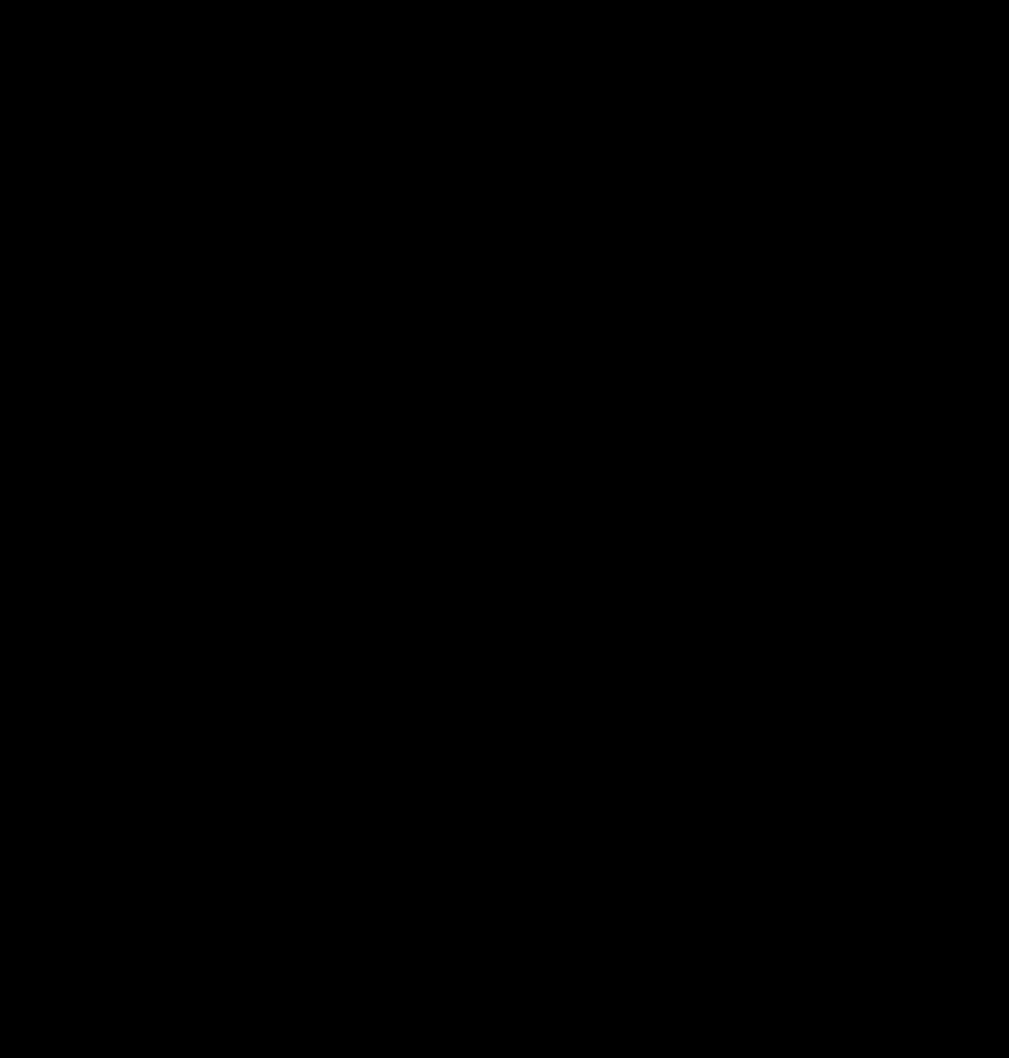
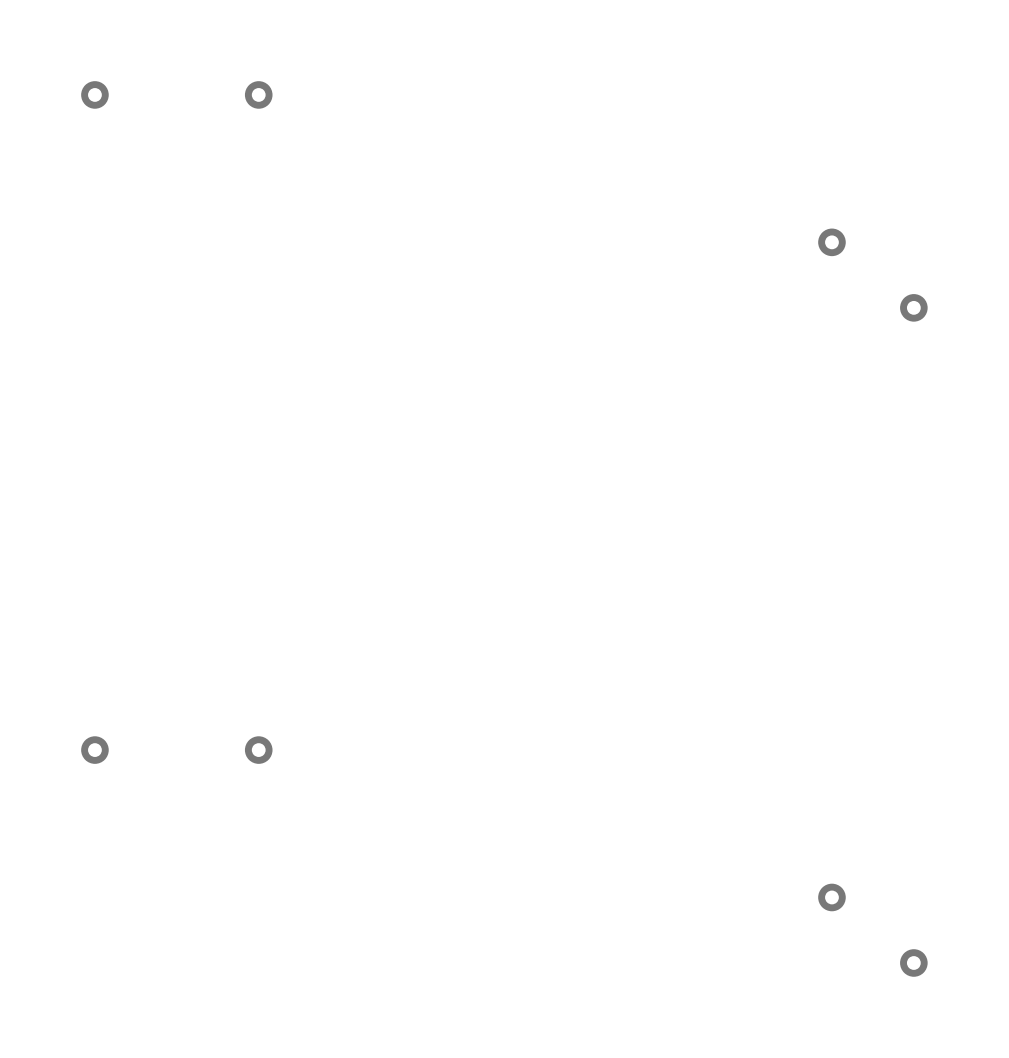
via: none -> (94, 94)
via: none -> (258, 94)
via: none -> (831, 242)
via: none -> (913, 307)
via: none -> (94, 750)
via: none -> (258, 750)
via: none -> (831, 897)
via: none -> (913, 962)

